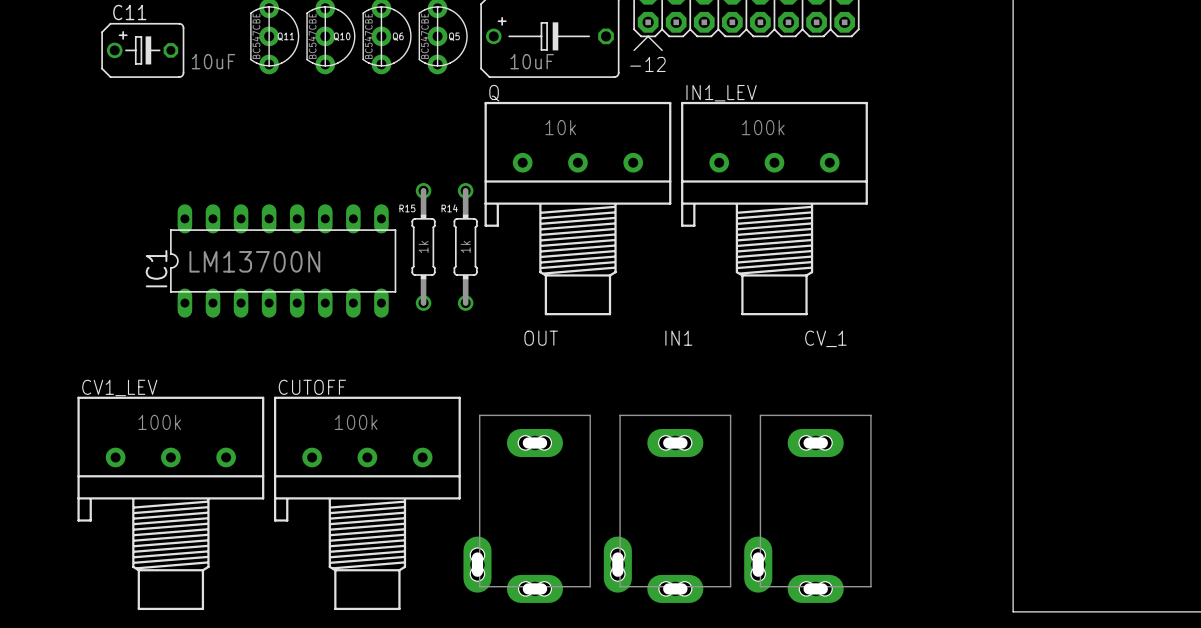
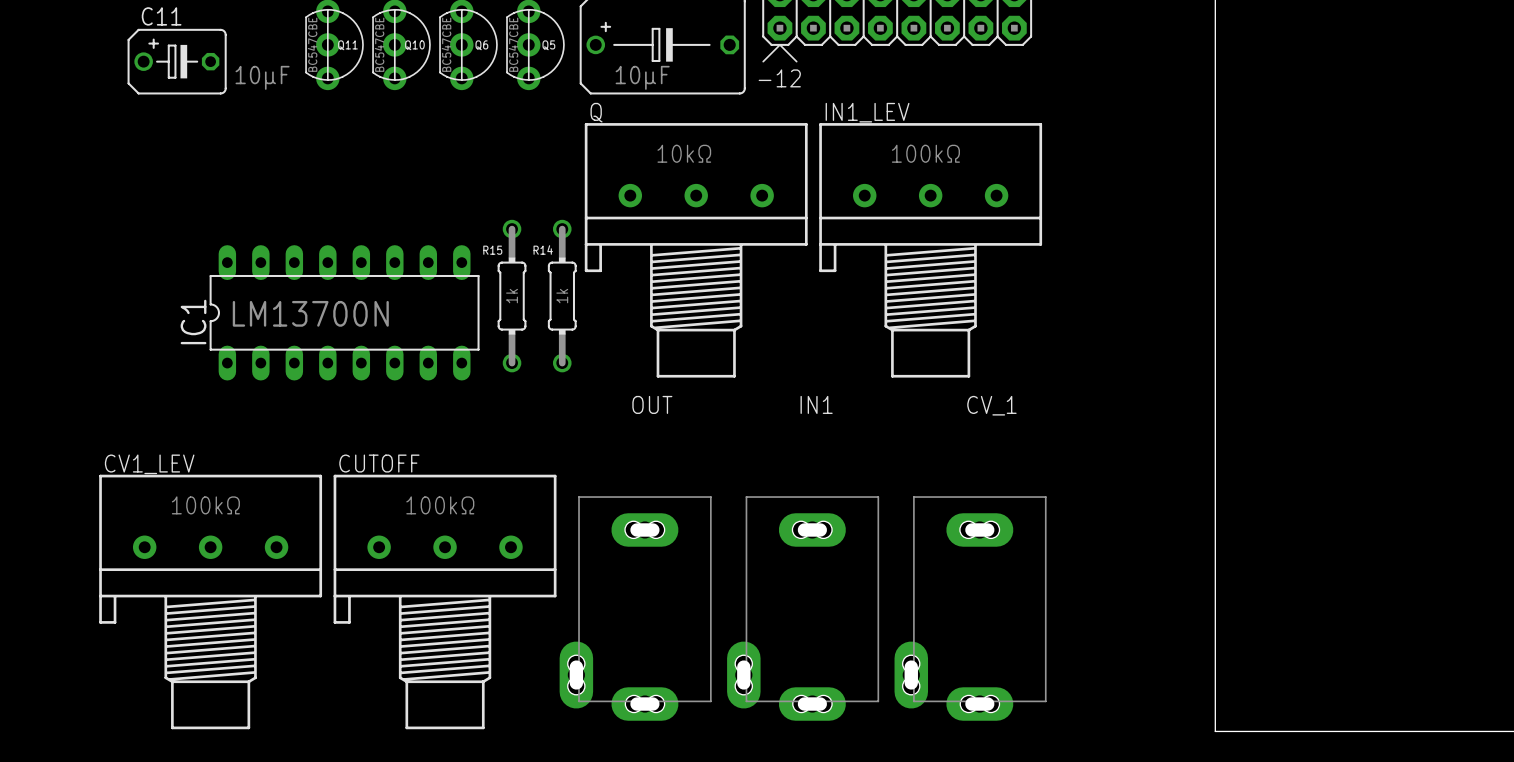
C11 value: 10uF (213, 61) -> 10μF (262, 77)
part value: 10uF (532, 61) -> 10μF (642, 77)
Q value: 10k (560, 127) -> 10kΩ (684, 153)
IN1_LEV value: 100k (763, 127) -> 100kΩ (925, 153)
CV1_LEV value: 100k (159, 422) -> 100kΩ (205, 505)
CUTOFF value: 100k (356, 422) -> 100kΩ (440, 505)

